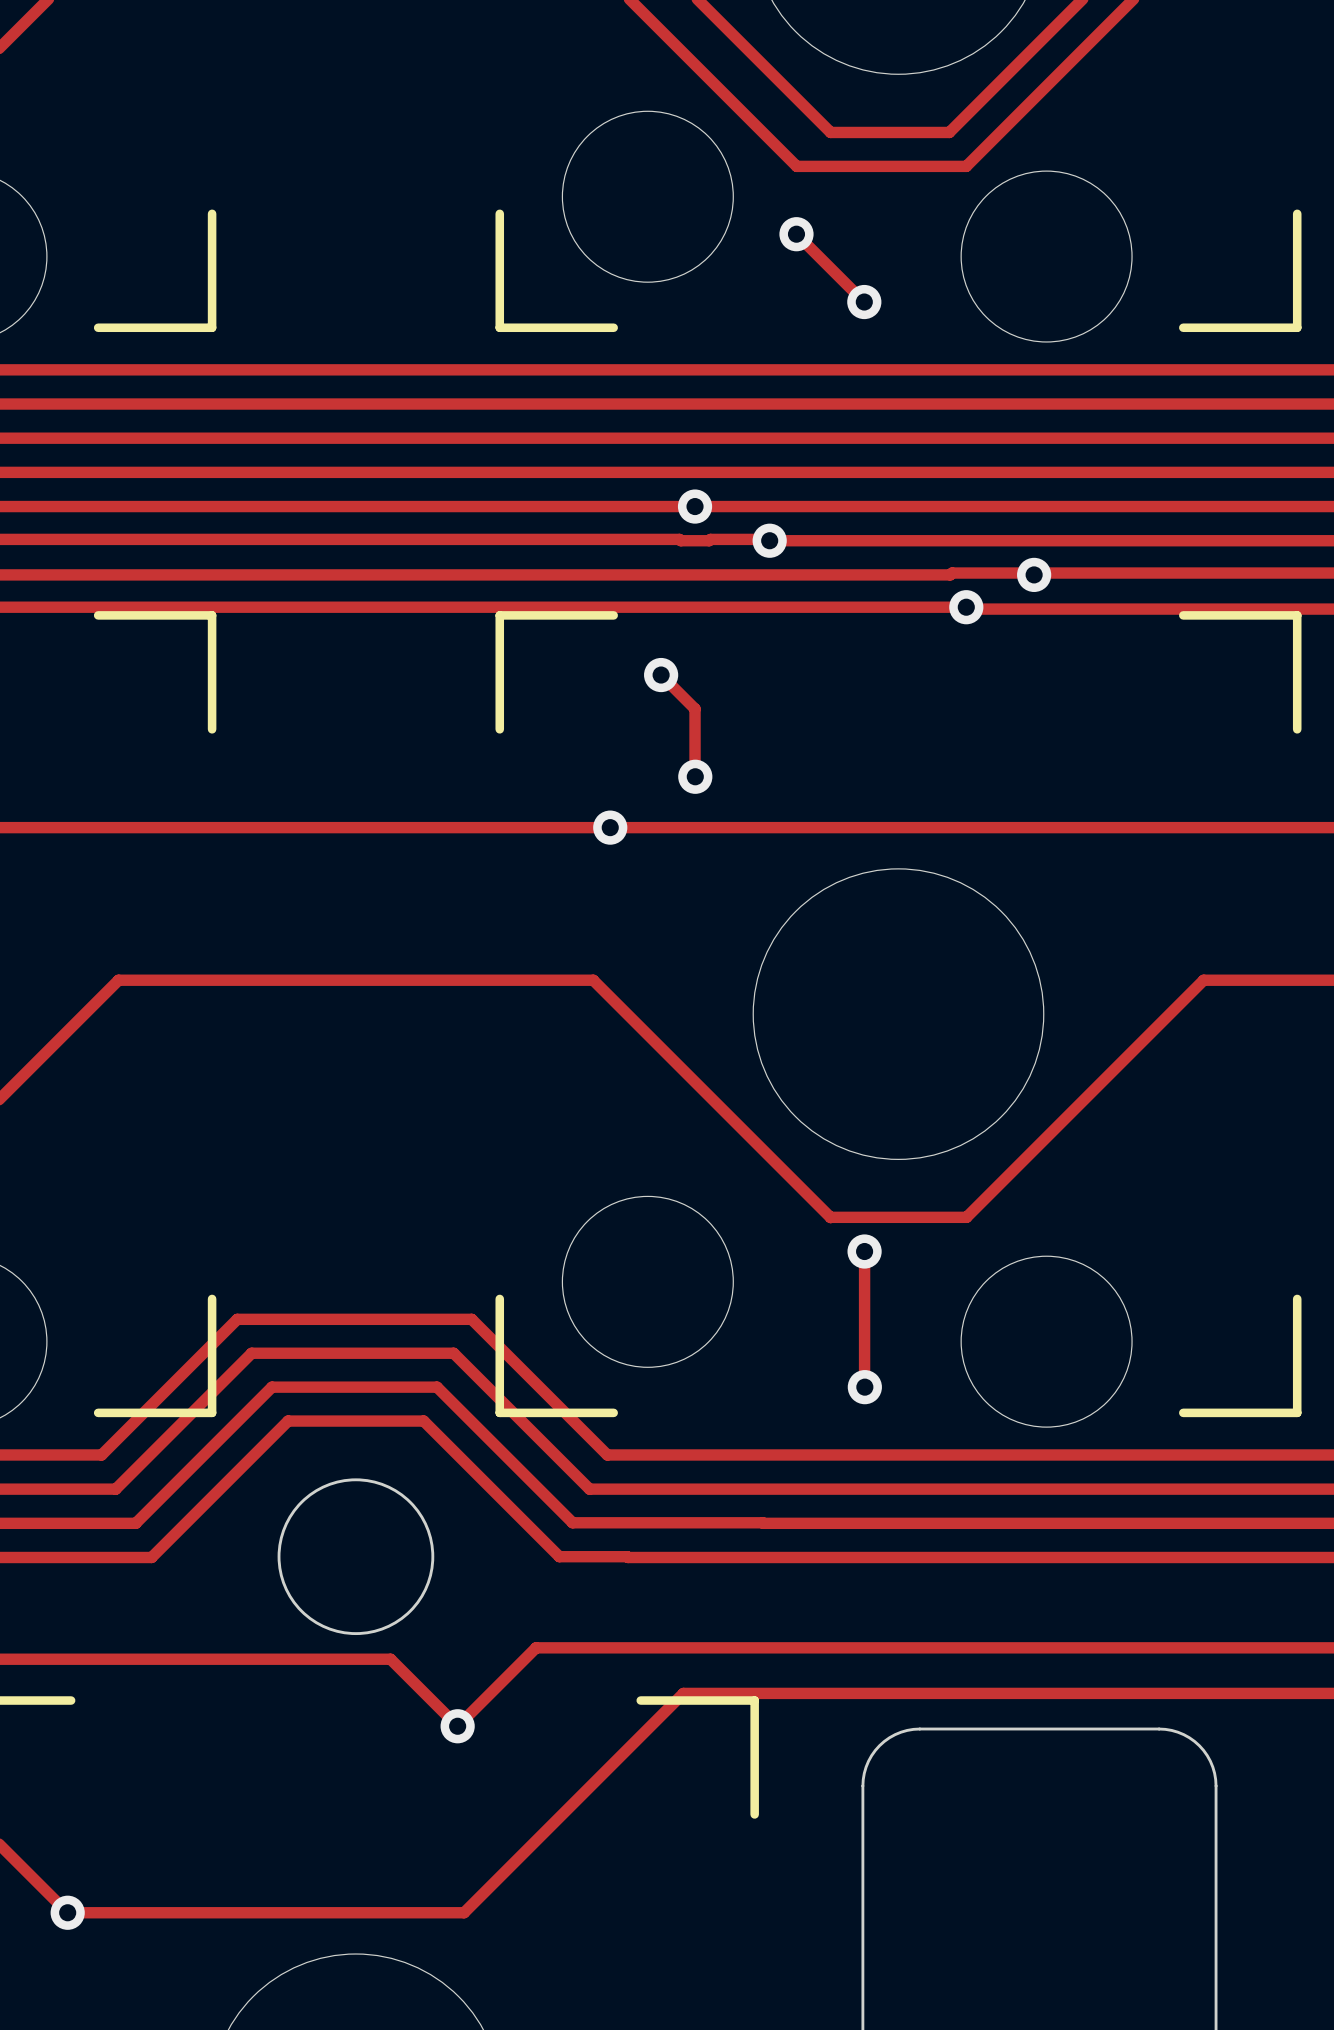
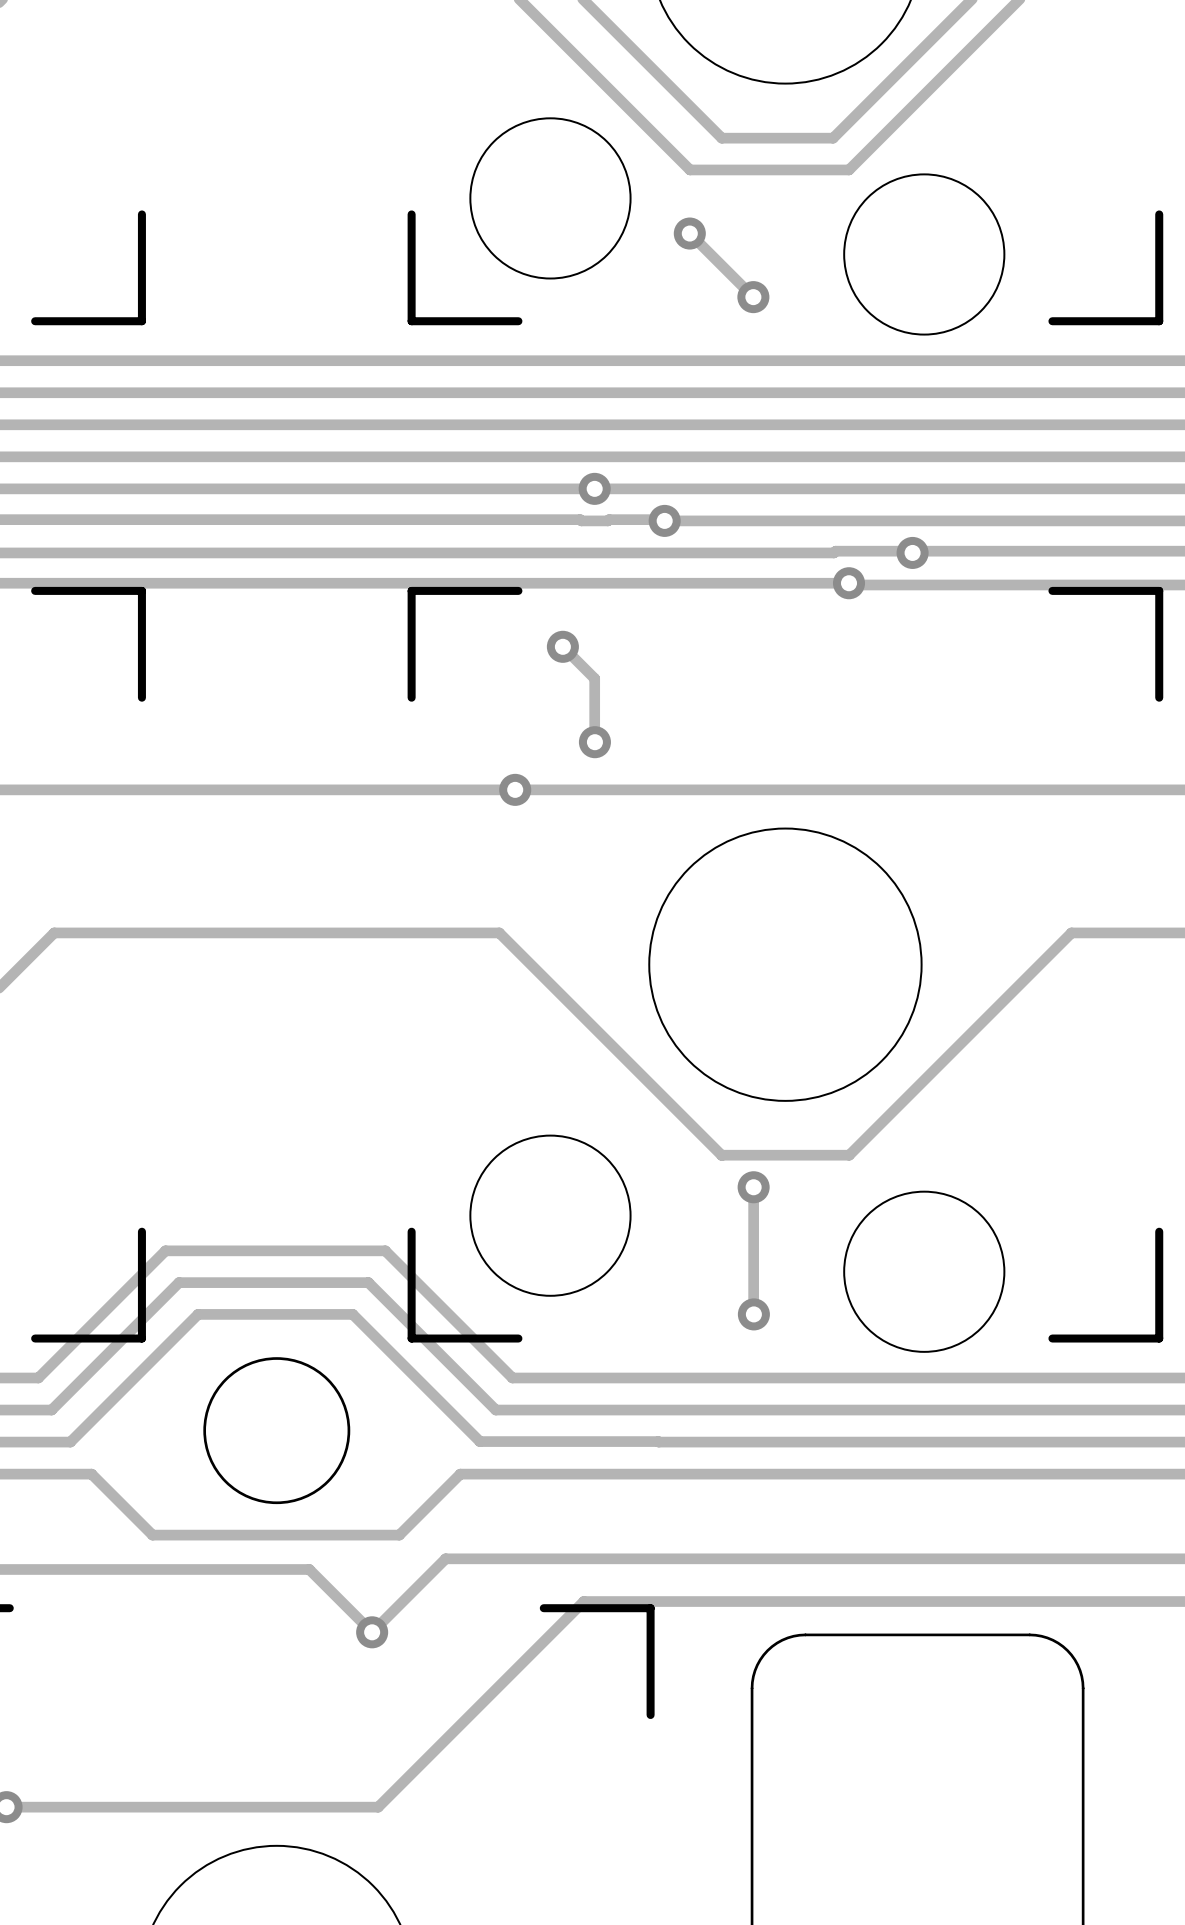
round board edge position: (355, 1556) -> (276, 1430)
track: (627, 1556) (559, 1556) (423, 1421) (288, 1421) (151, 1557) -> (531, 1474) (460, 1474) (399, 1535) (152, 1535) (91, 1474) (85, 1474)

